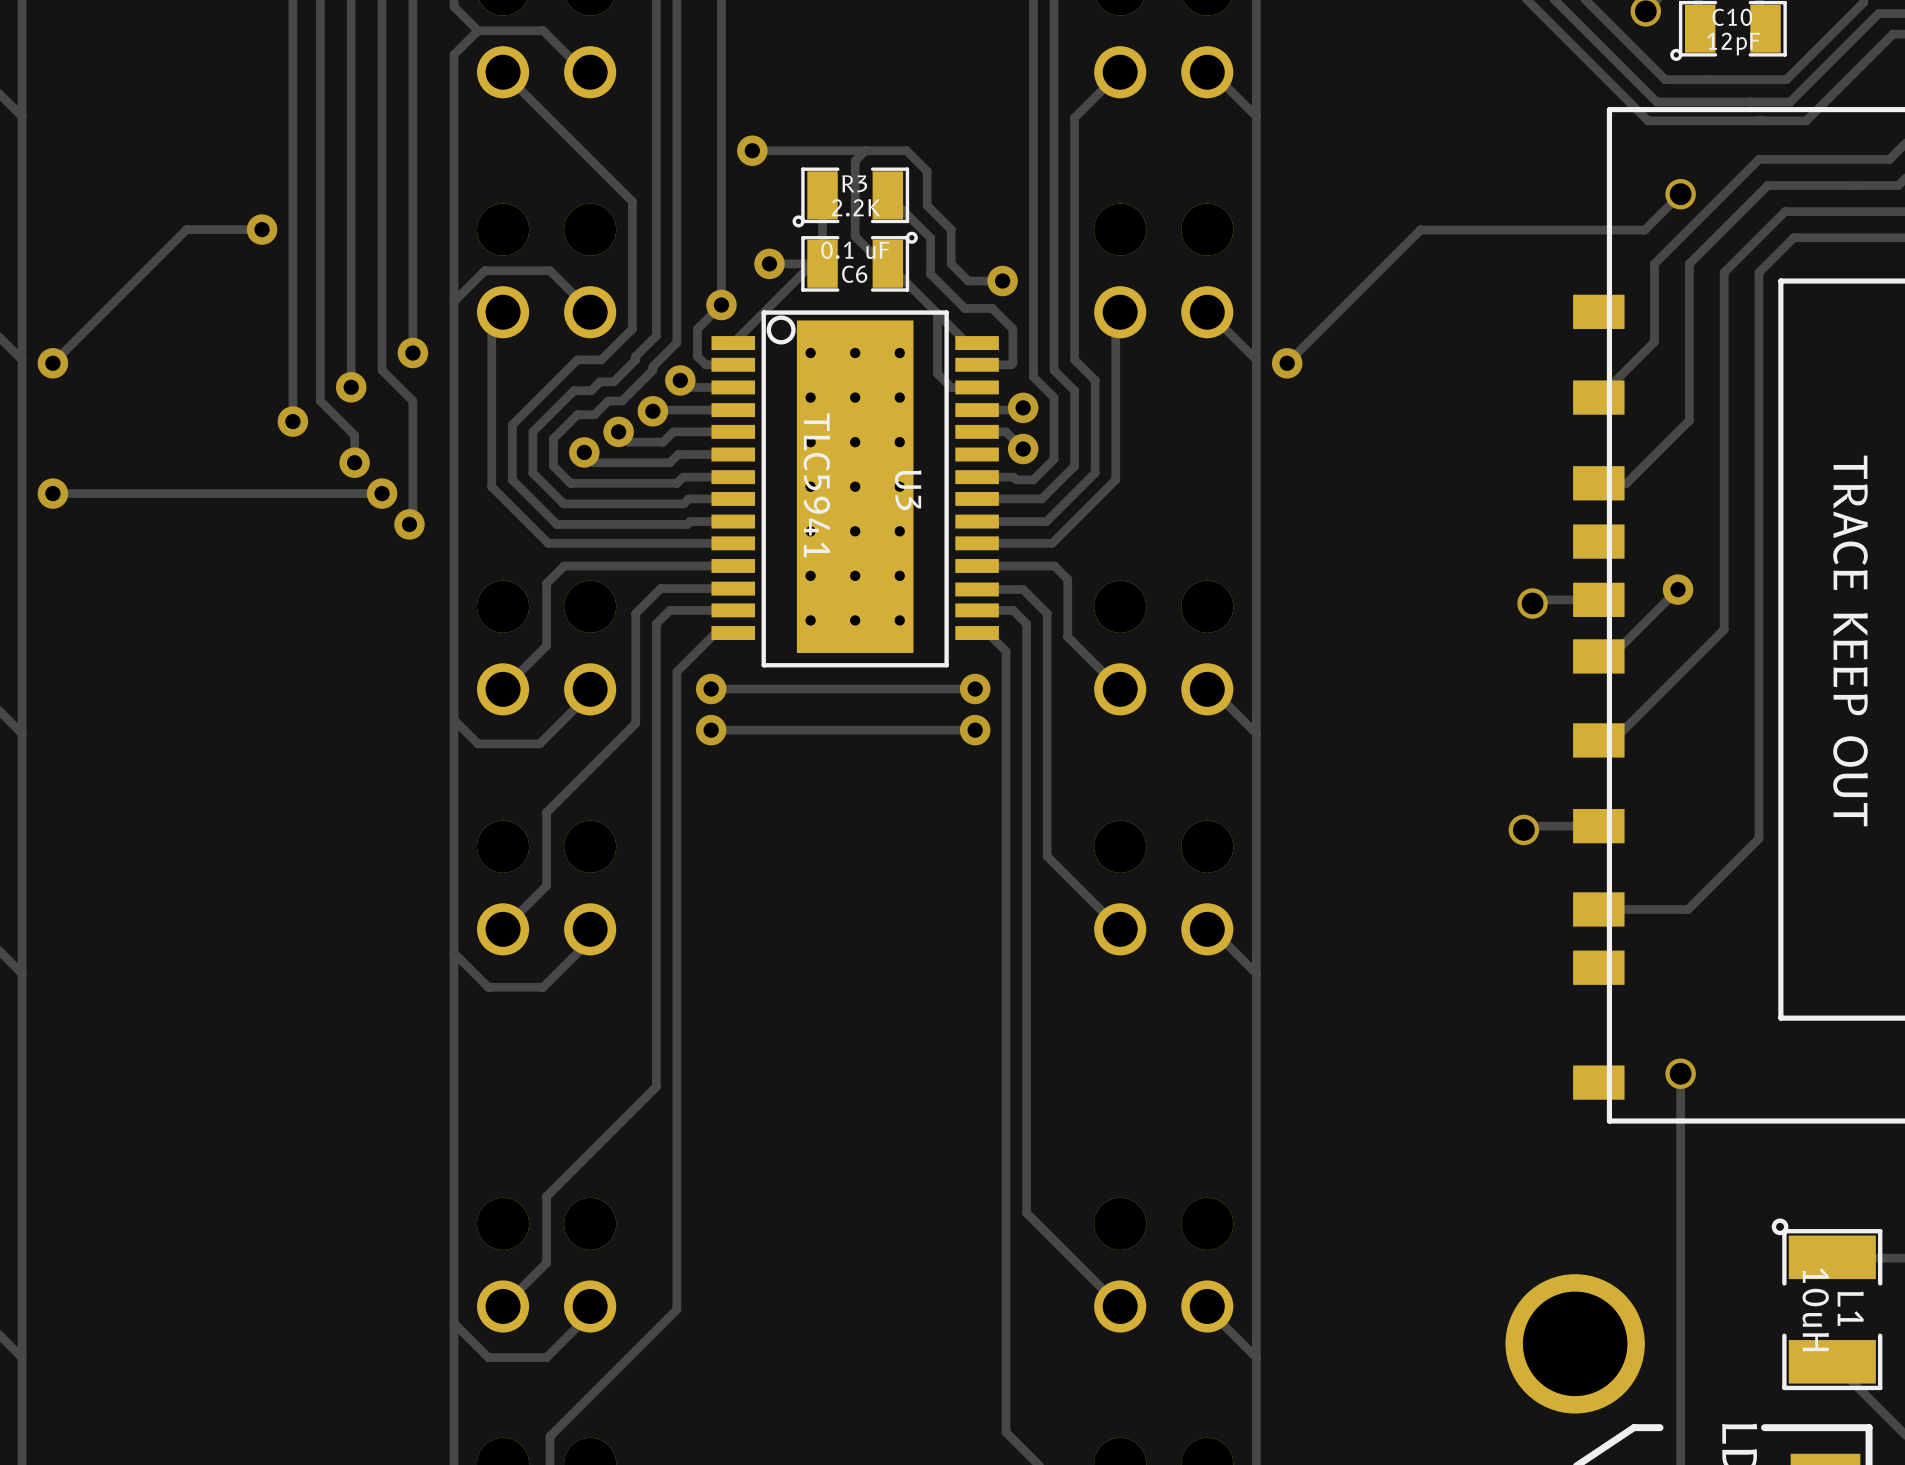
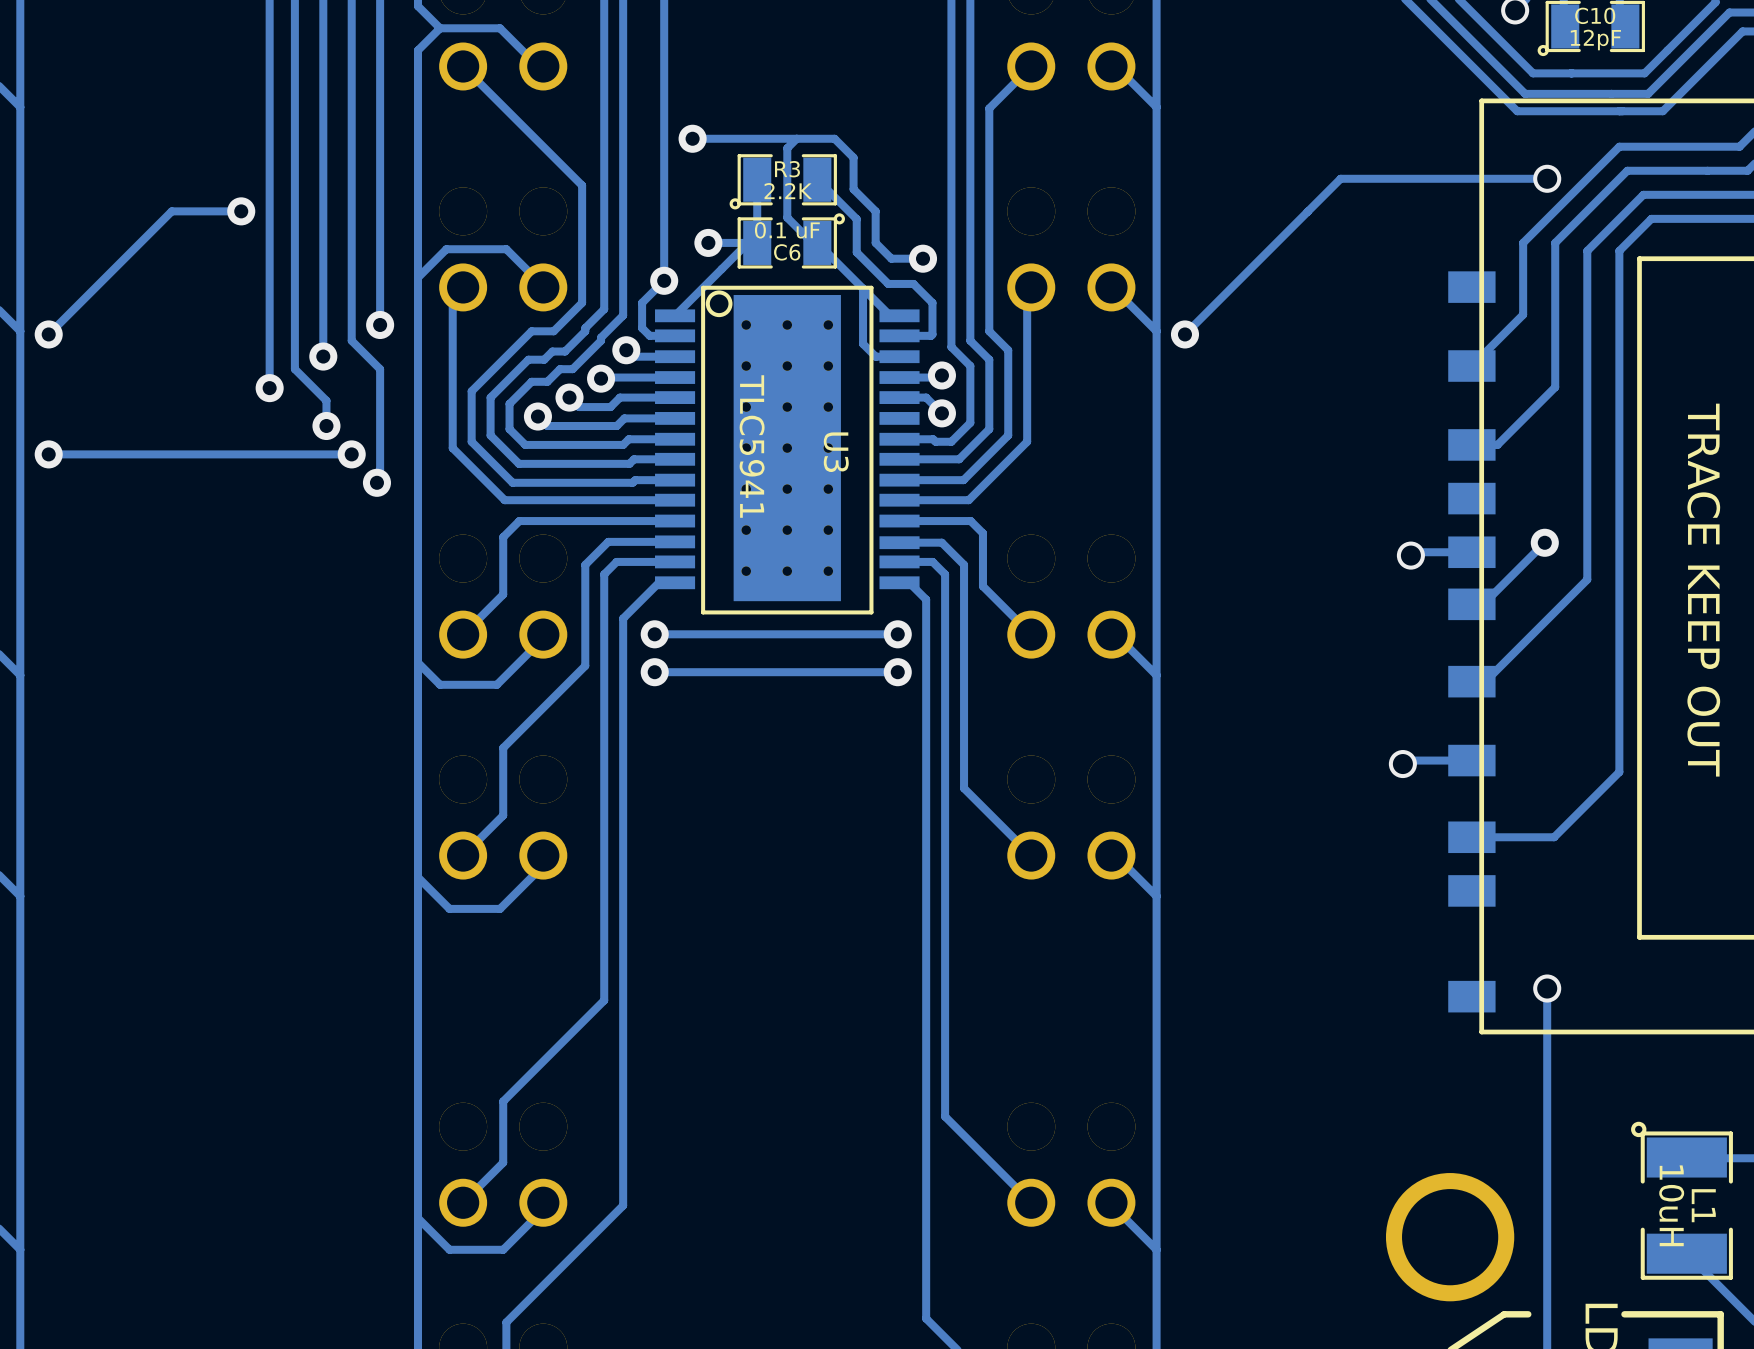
track: (1680, 194) (1644, 230) (1420, 230) -> (1547, 178) (1340, 178) (1308, 211)

